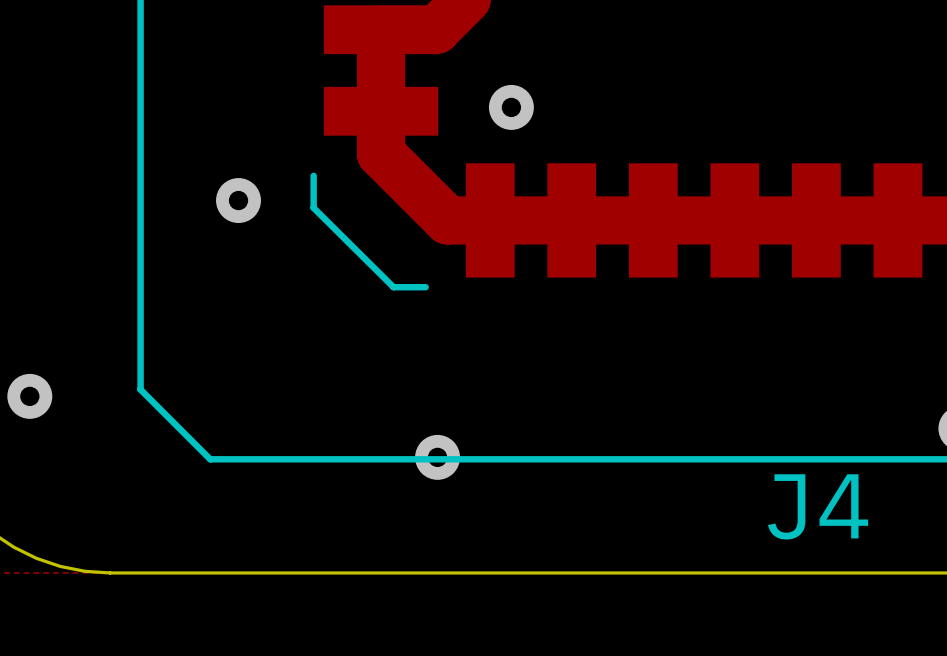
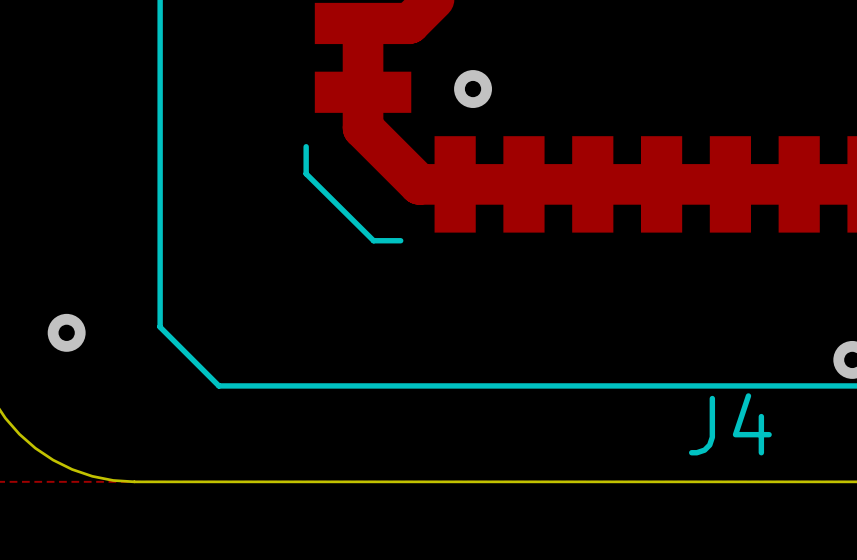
via: (238, 200) -> none
via: (437, 457) -> none

